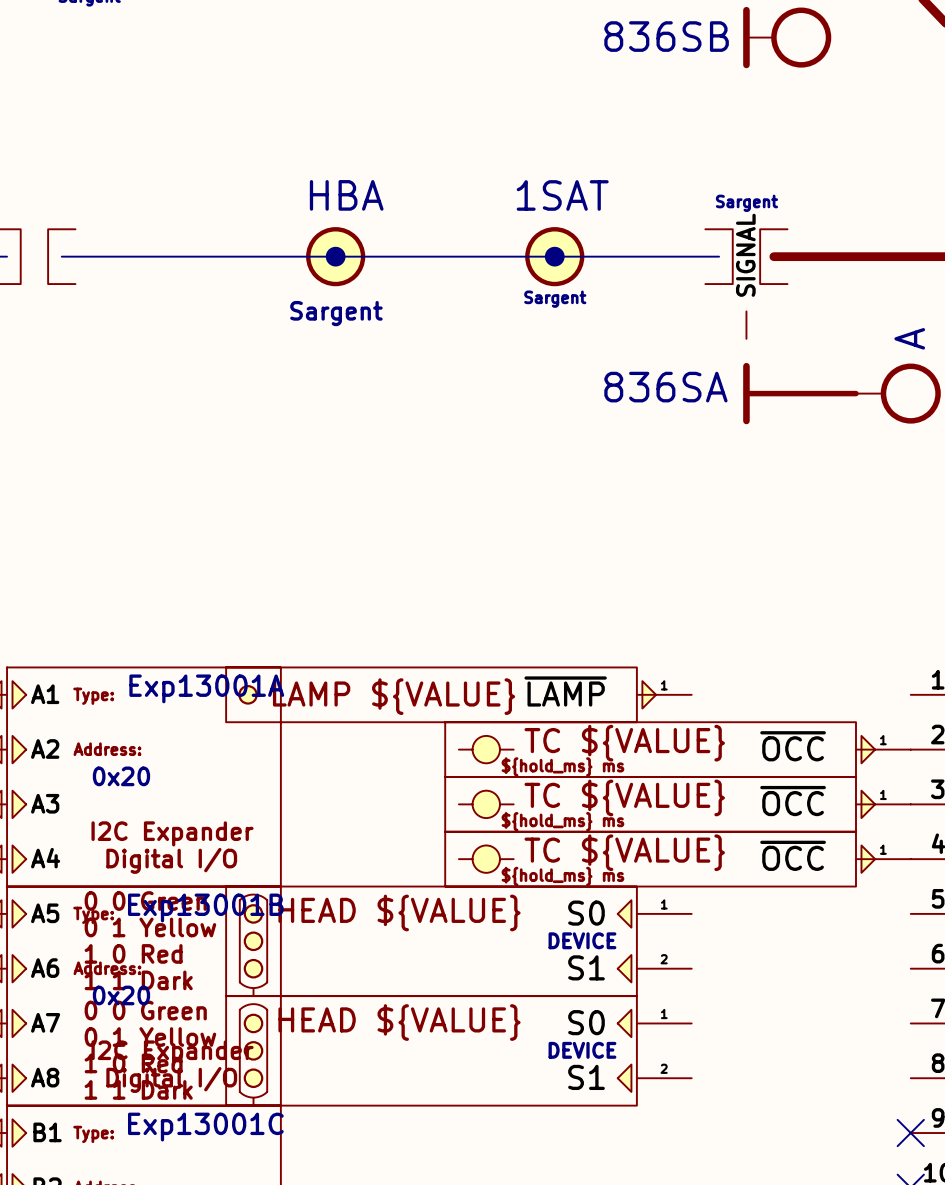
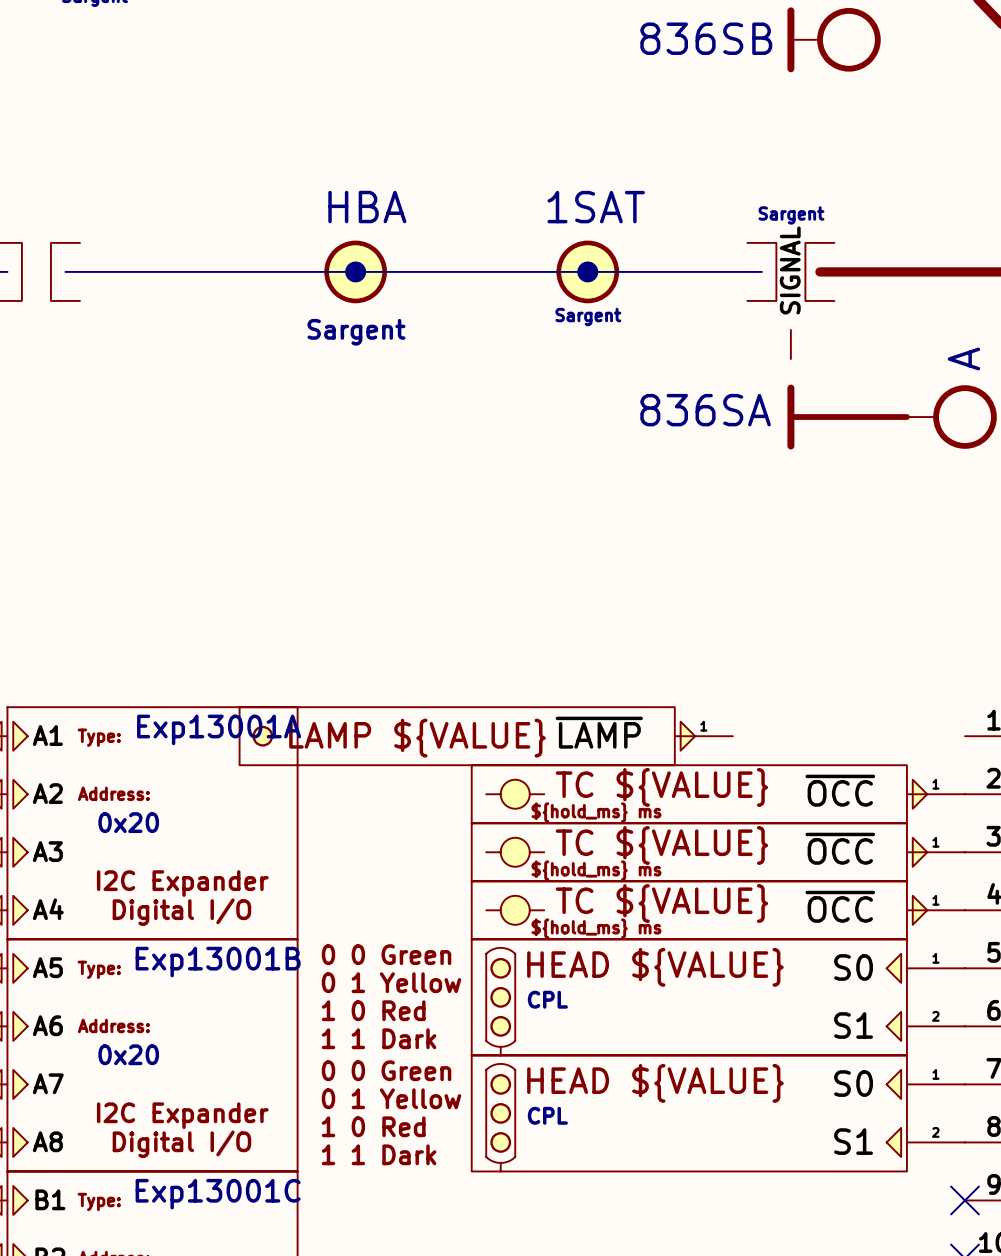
part: (458, 941) -> none
part: none -> (718, 997)
part: (458, 1050) -> none
part: none -> (718, 1113)

